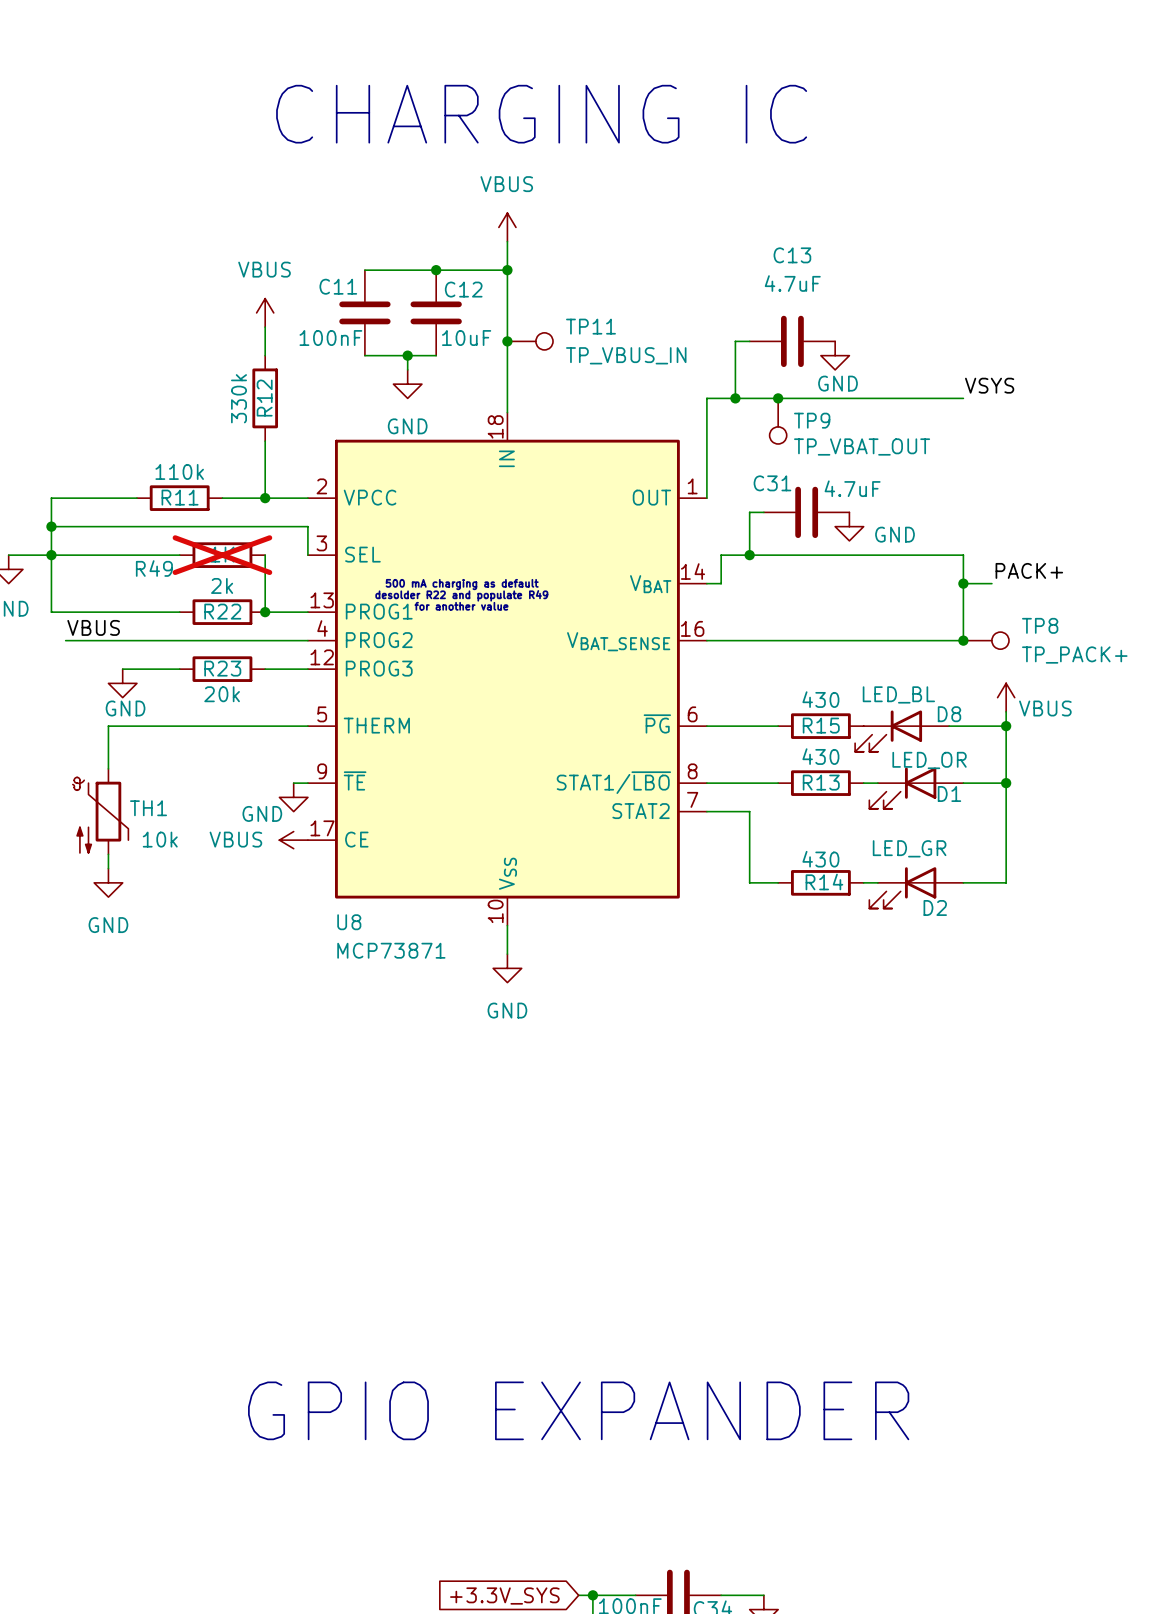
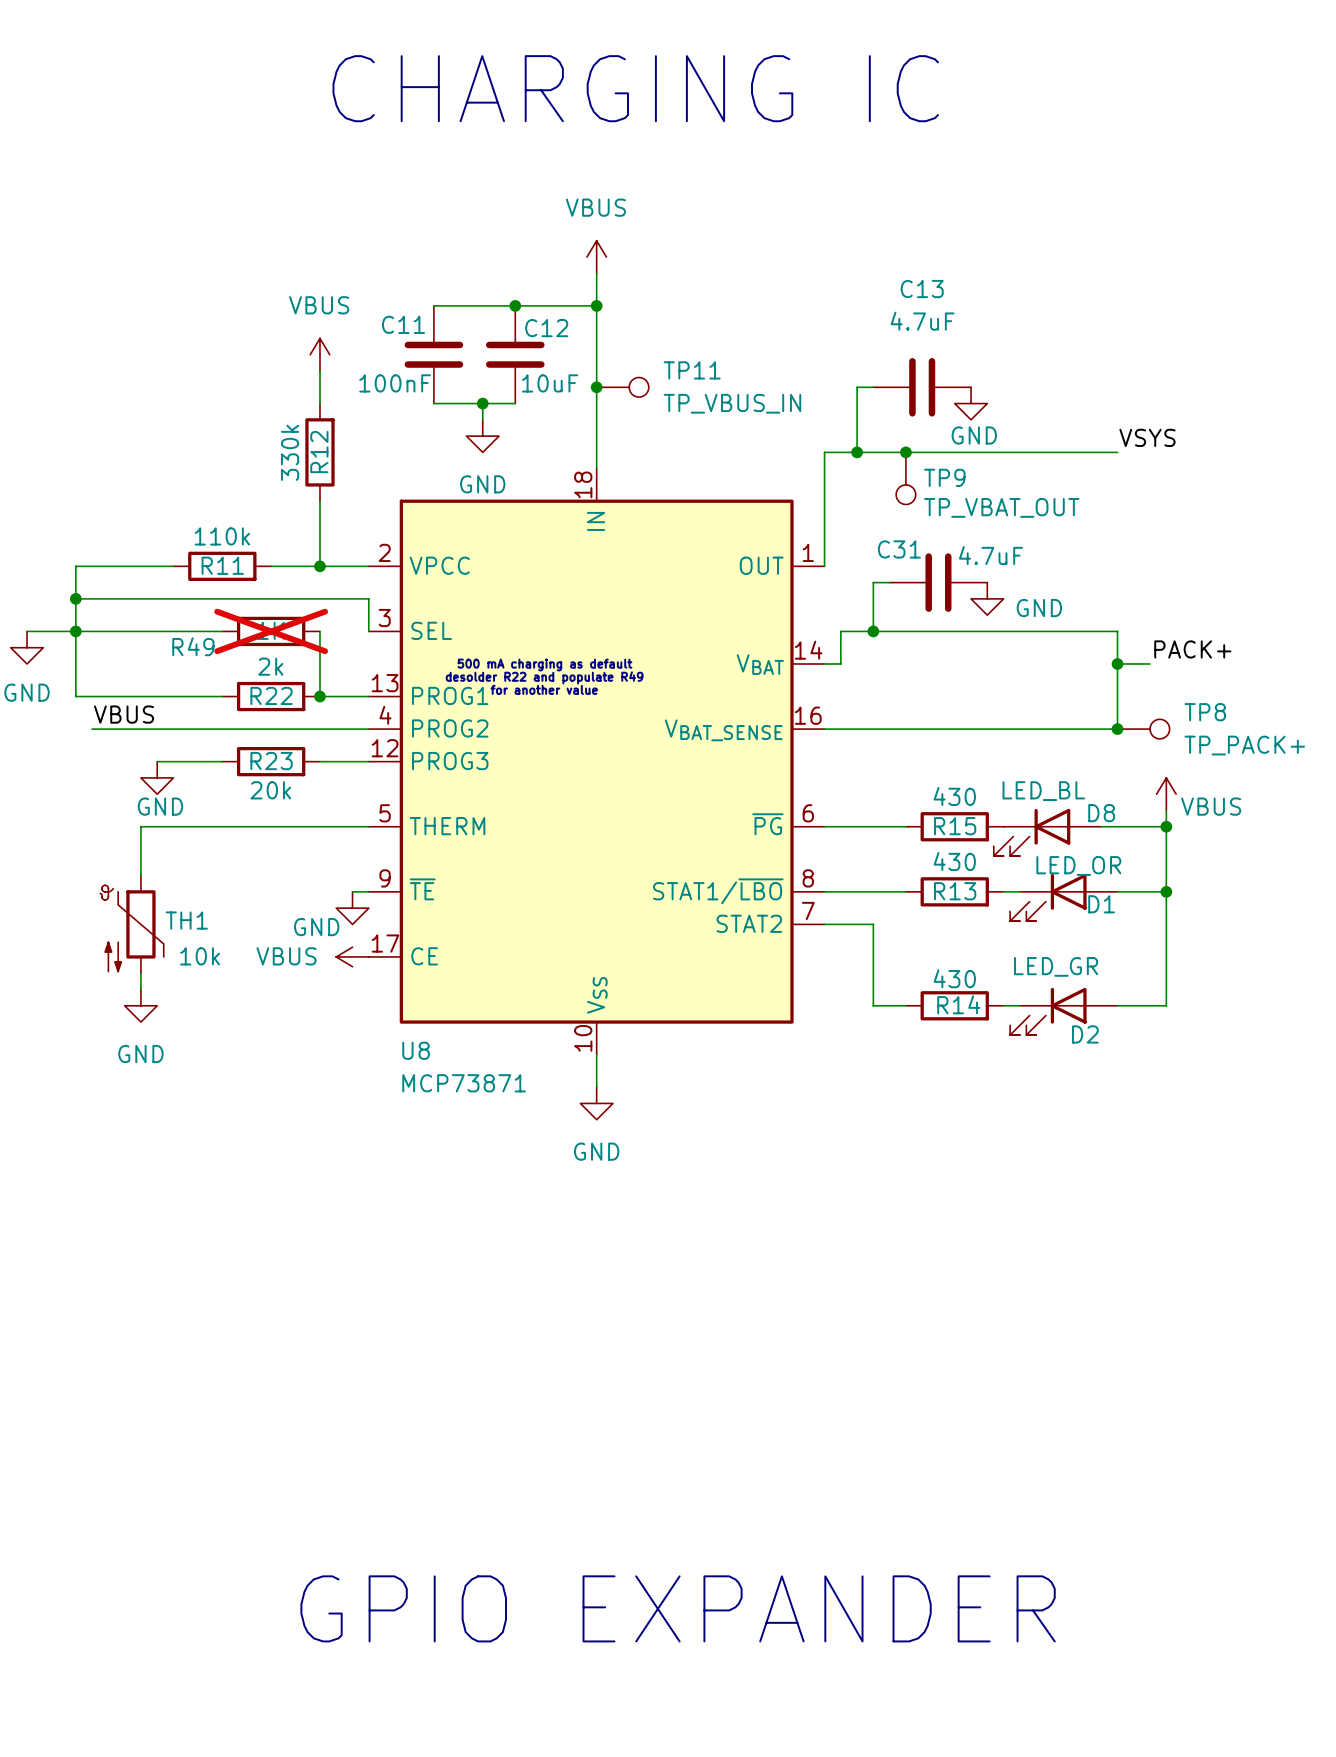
text position: CHARGING IC (541, 114) -> CHARGING IC (635, 88)

